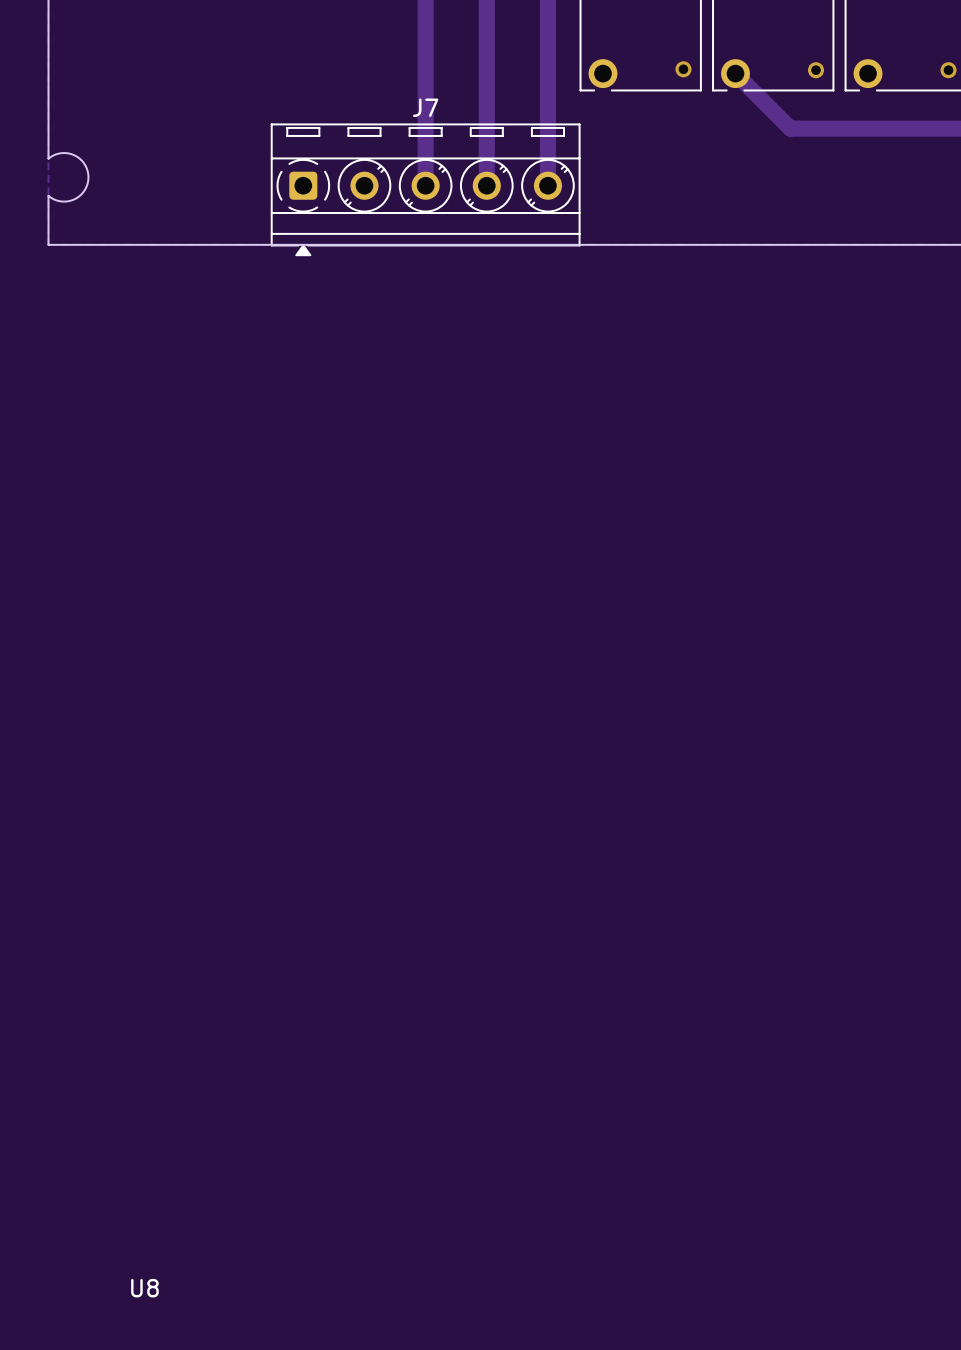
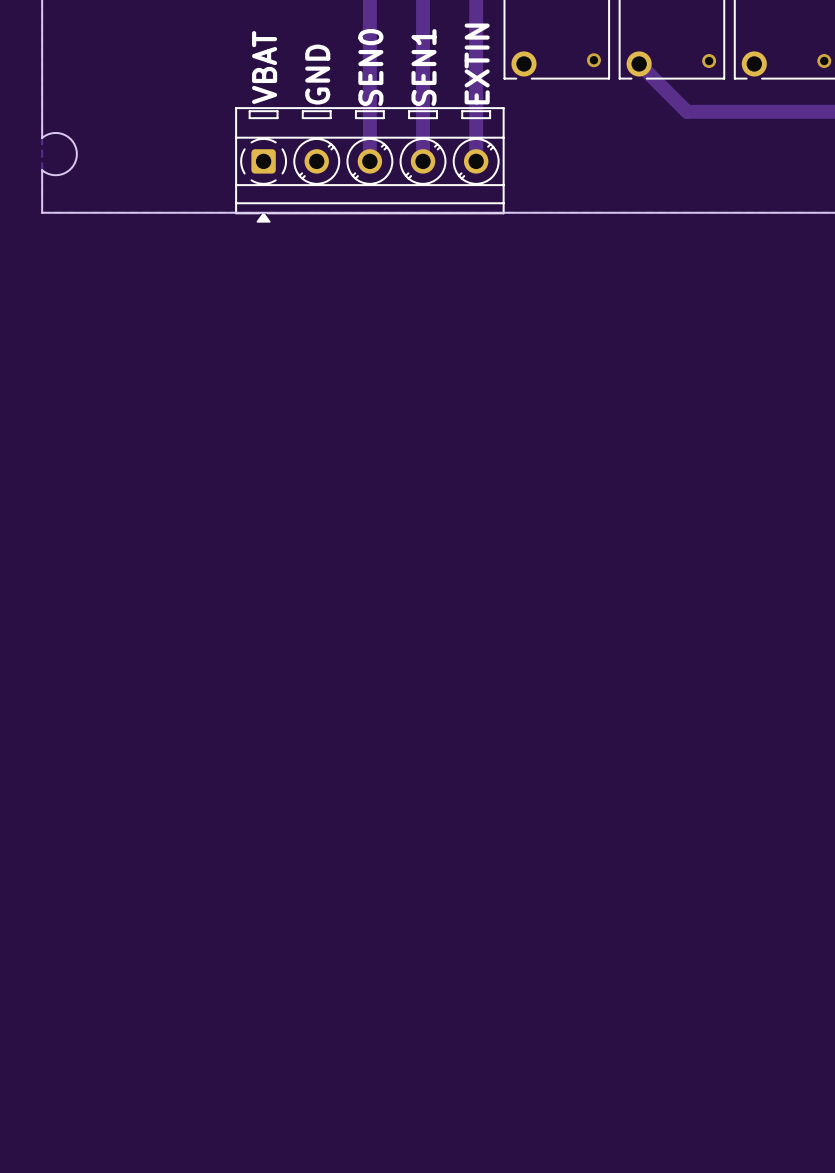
text: none -> EXTIN (477, 63)
text: none -> VBAT (264, 67)
text: none -> SEN0 (370, 67)
text: none -> SEN1 (424, 67)
text: none -> GND (317, 74)
J7 name: J7 (425, 107) -> none
U8 name: U8 (144, 1288) -> none

